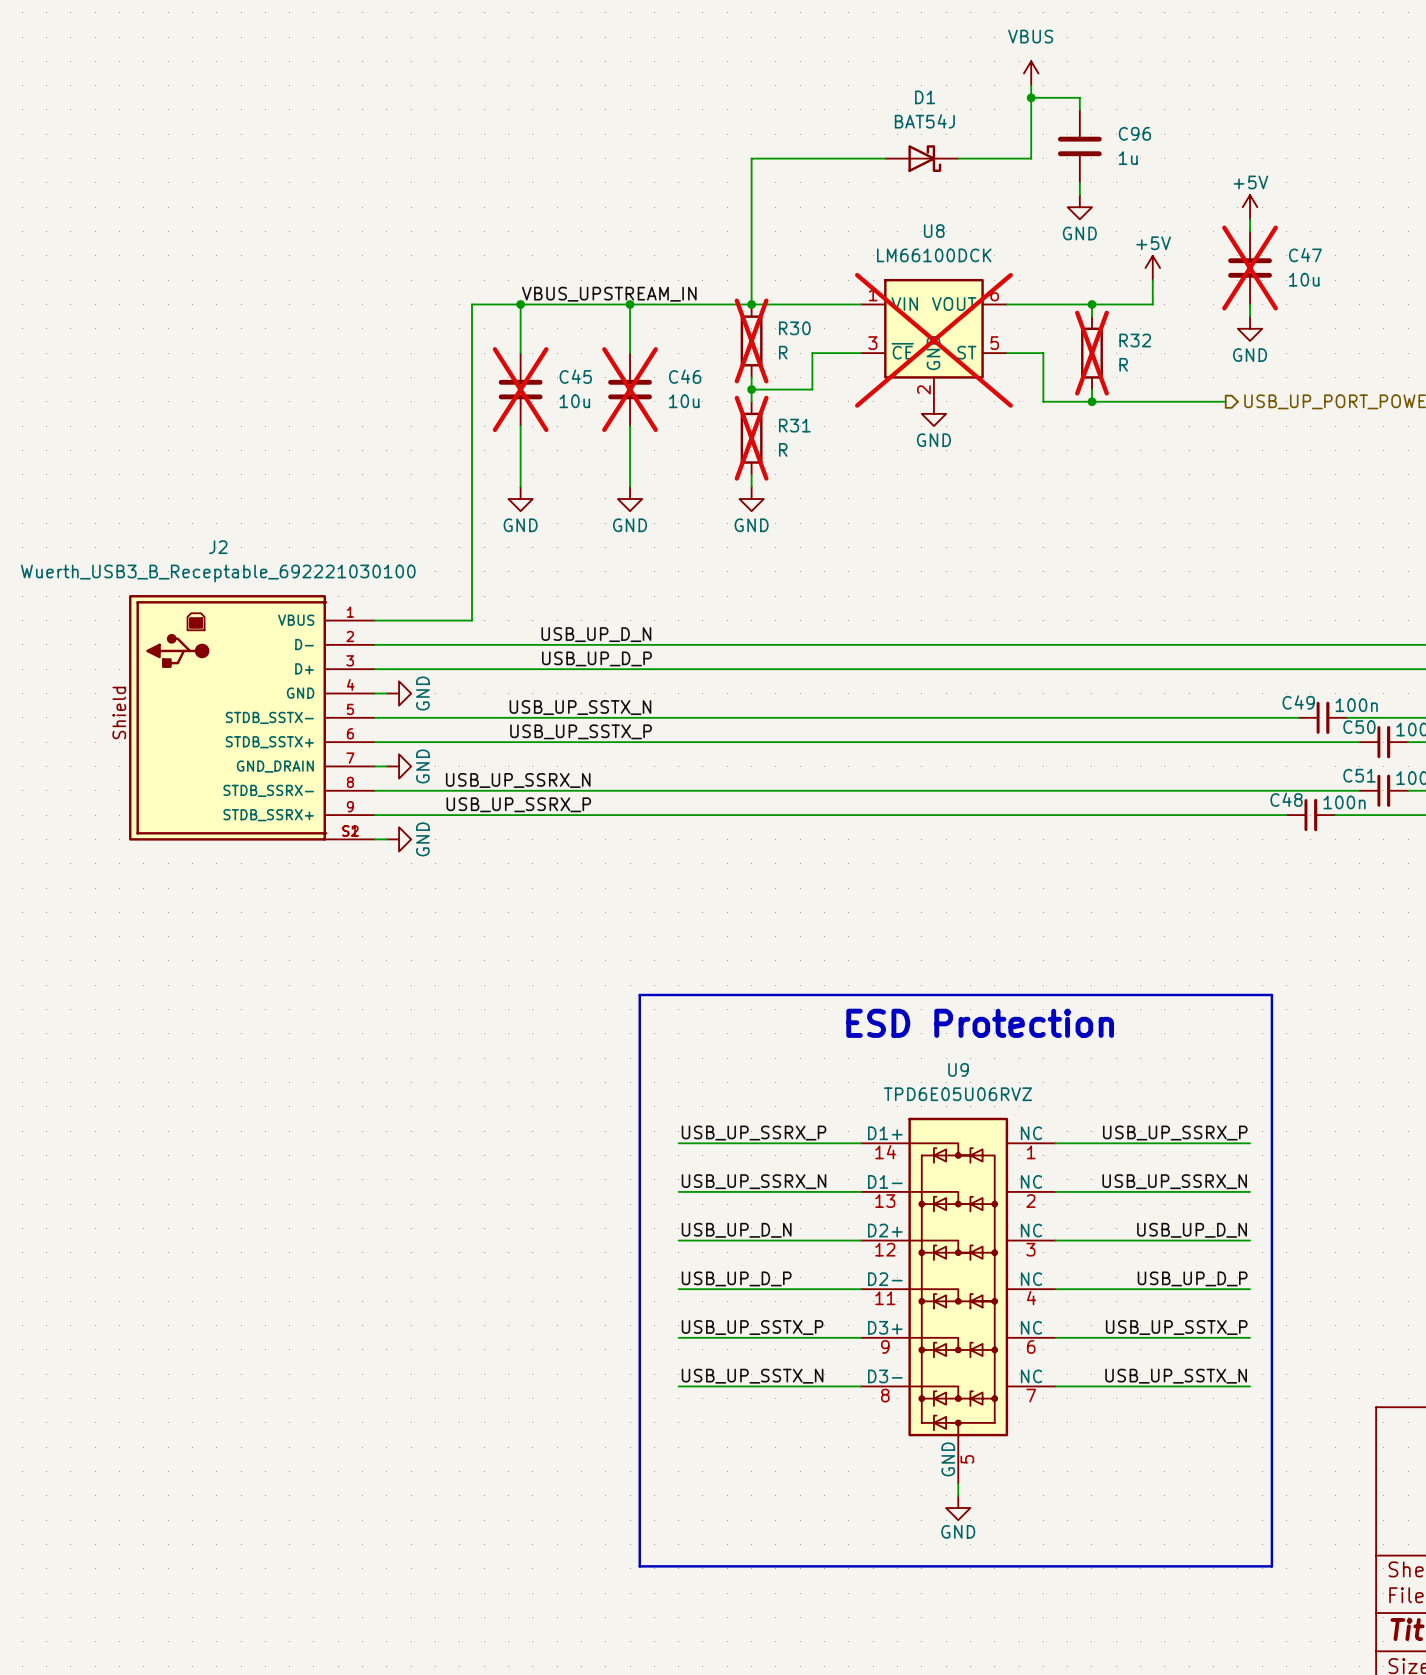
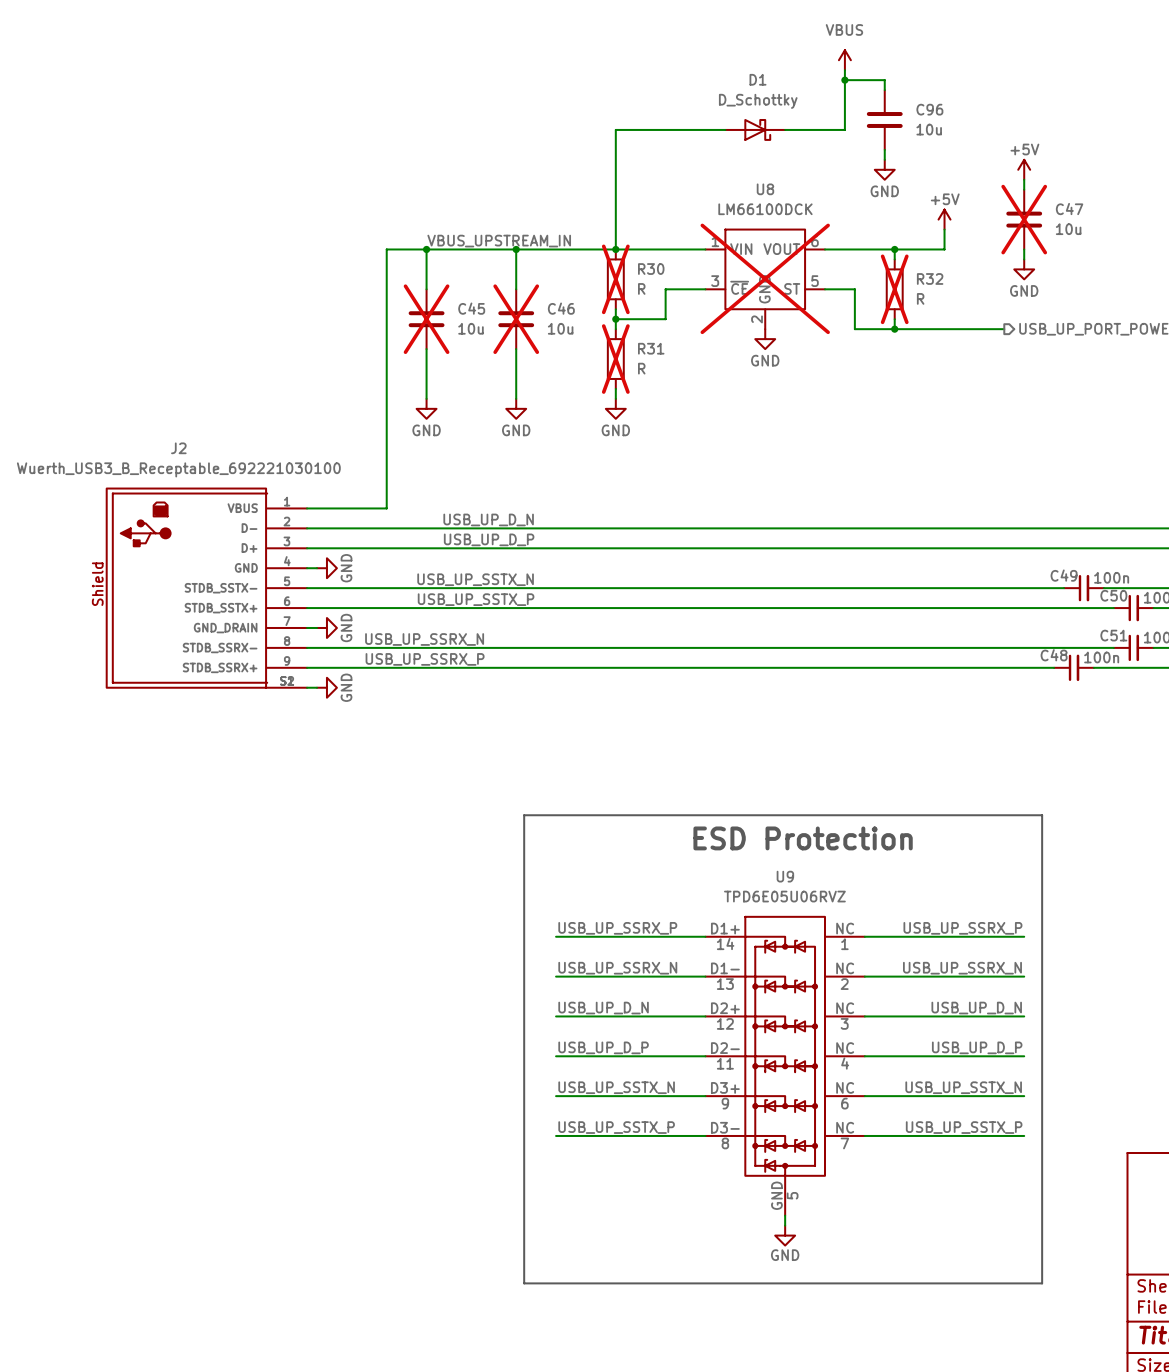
D1 value: BAT54J (924, 121) -> D_Schottky (758, 101)
C96 value: 1u (1128, 158) -> 10u (929, 129)
label: USB_UP_SSTX_P (752, 1327) -> USB_UP_SSTX_N (616, 1087)
label: USB_UP_SSTX_P (1176, 1327) -> USB_UP_SSTX_N (963, 1087)
label: USB_UP_SSTX_N (752, 1376) -> USB_UP_SSTX_P (616, 1127)
label: USB_UP_SSTX_N (1176, 1376) -> USB_UP_SSTX_P (964, 1127)

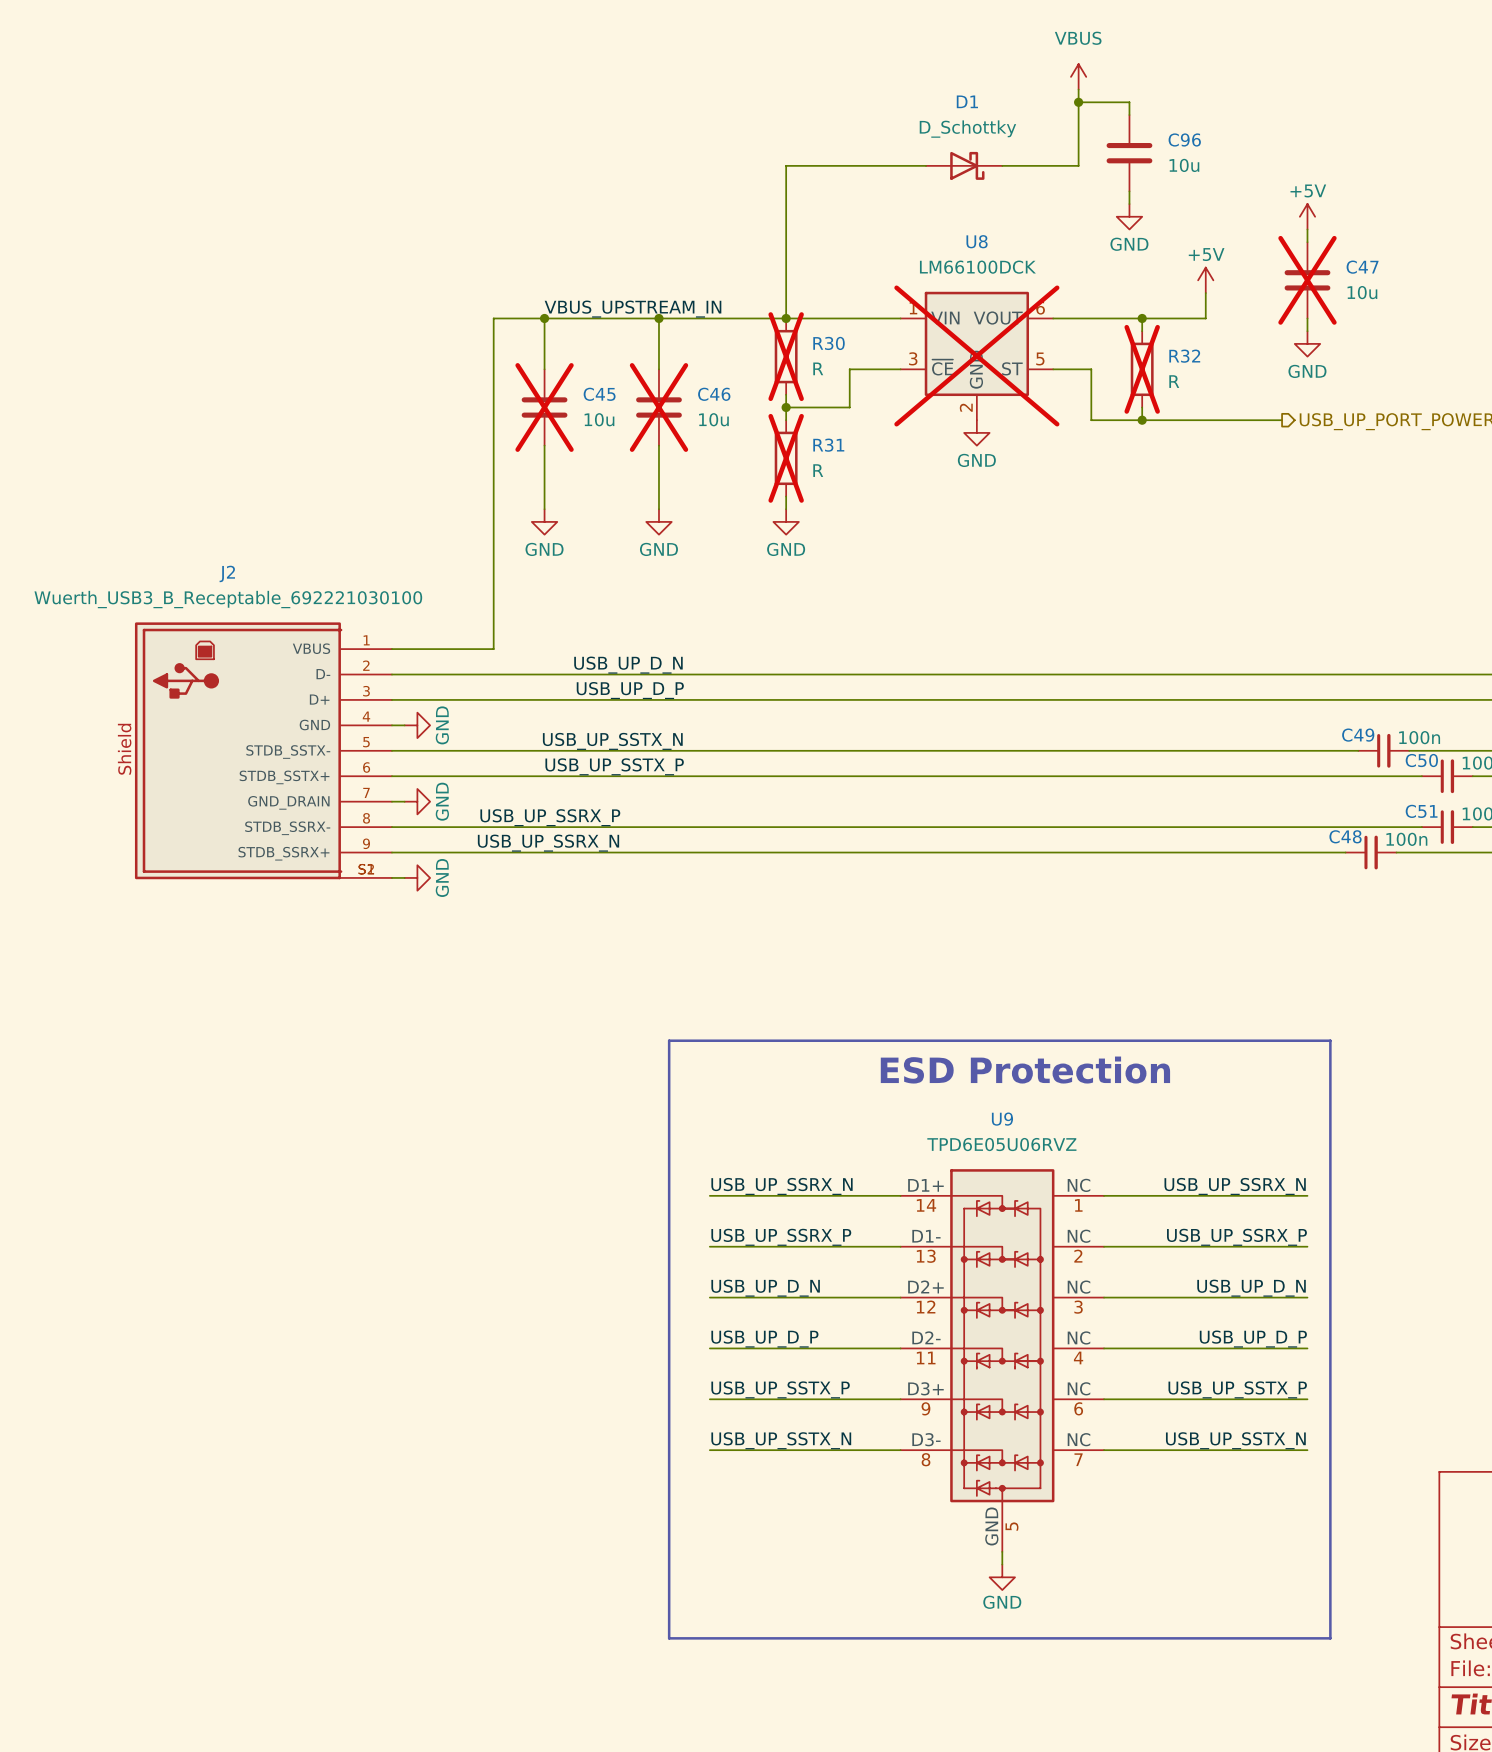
label: USB_UP_SSRX_N (424, 639) -> USB_UP_SSRX_P (550, 817)
label: USB_UP_SSRX_P (425, 659) -> USB_UP_SSRX_N (548, 843)
label: USB_UP_SSRX_P (617, 928) -> USB_UP_SSRX_N (782, 1186)
label: USB_UP_SSRX_P (962, 928) -> USB_UP_SSRX_N (1235, 1186)
label: USB_UP_SSRX_N (617, 968) -> USB_UP_SSRX_P (781, 1237)
label: USB_UP_SSRX_N (962, 968) -> USB_UP_SSRX_P (1236, 1237)
label: USB_UP_SSTX_N (616, 1087) -> USB_UP_SSTX_P (780, 1389)
label: USB_UP_SSTX_N (963, 1087) -> USB_UP_SSTX_P (1237, 1389)
label: USB_UP_SSTX_P (616, 1127) -> USB_UP_SSTX_N (781, 1440)
label: USB_UP_SSTX_P (964, 1127) -> USB_UP_SSTX_N (1235, 1440)

